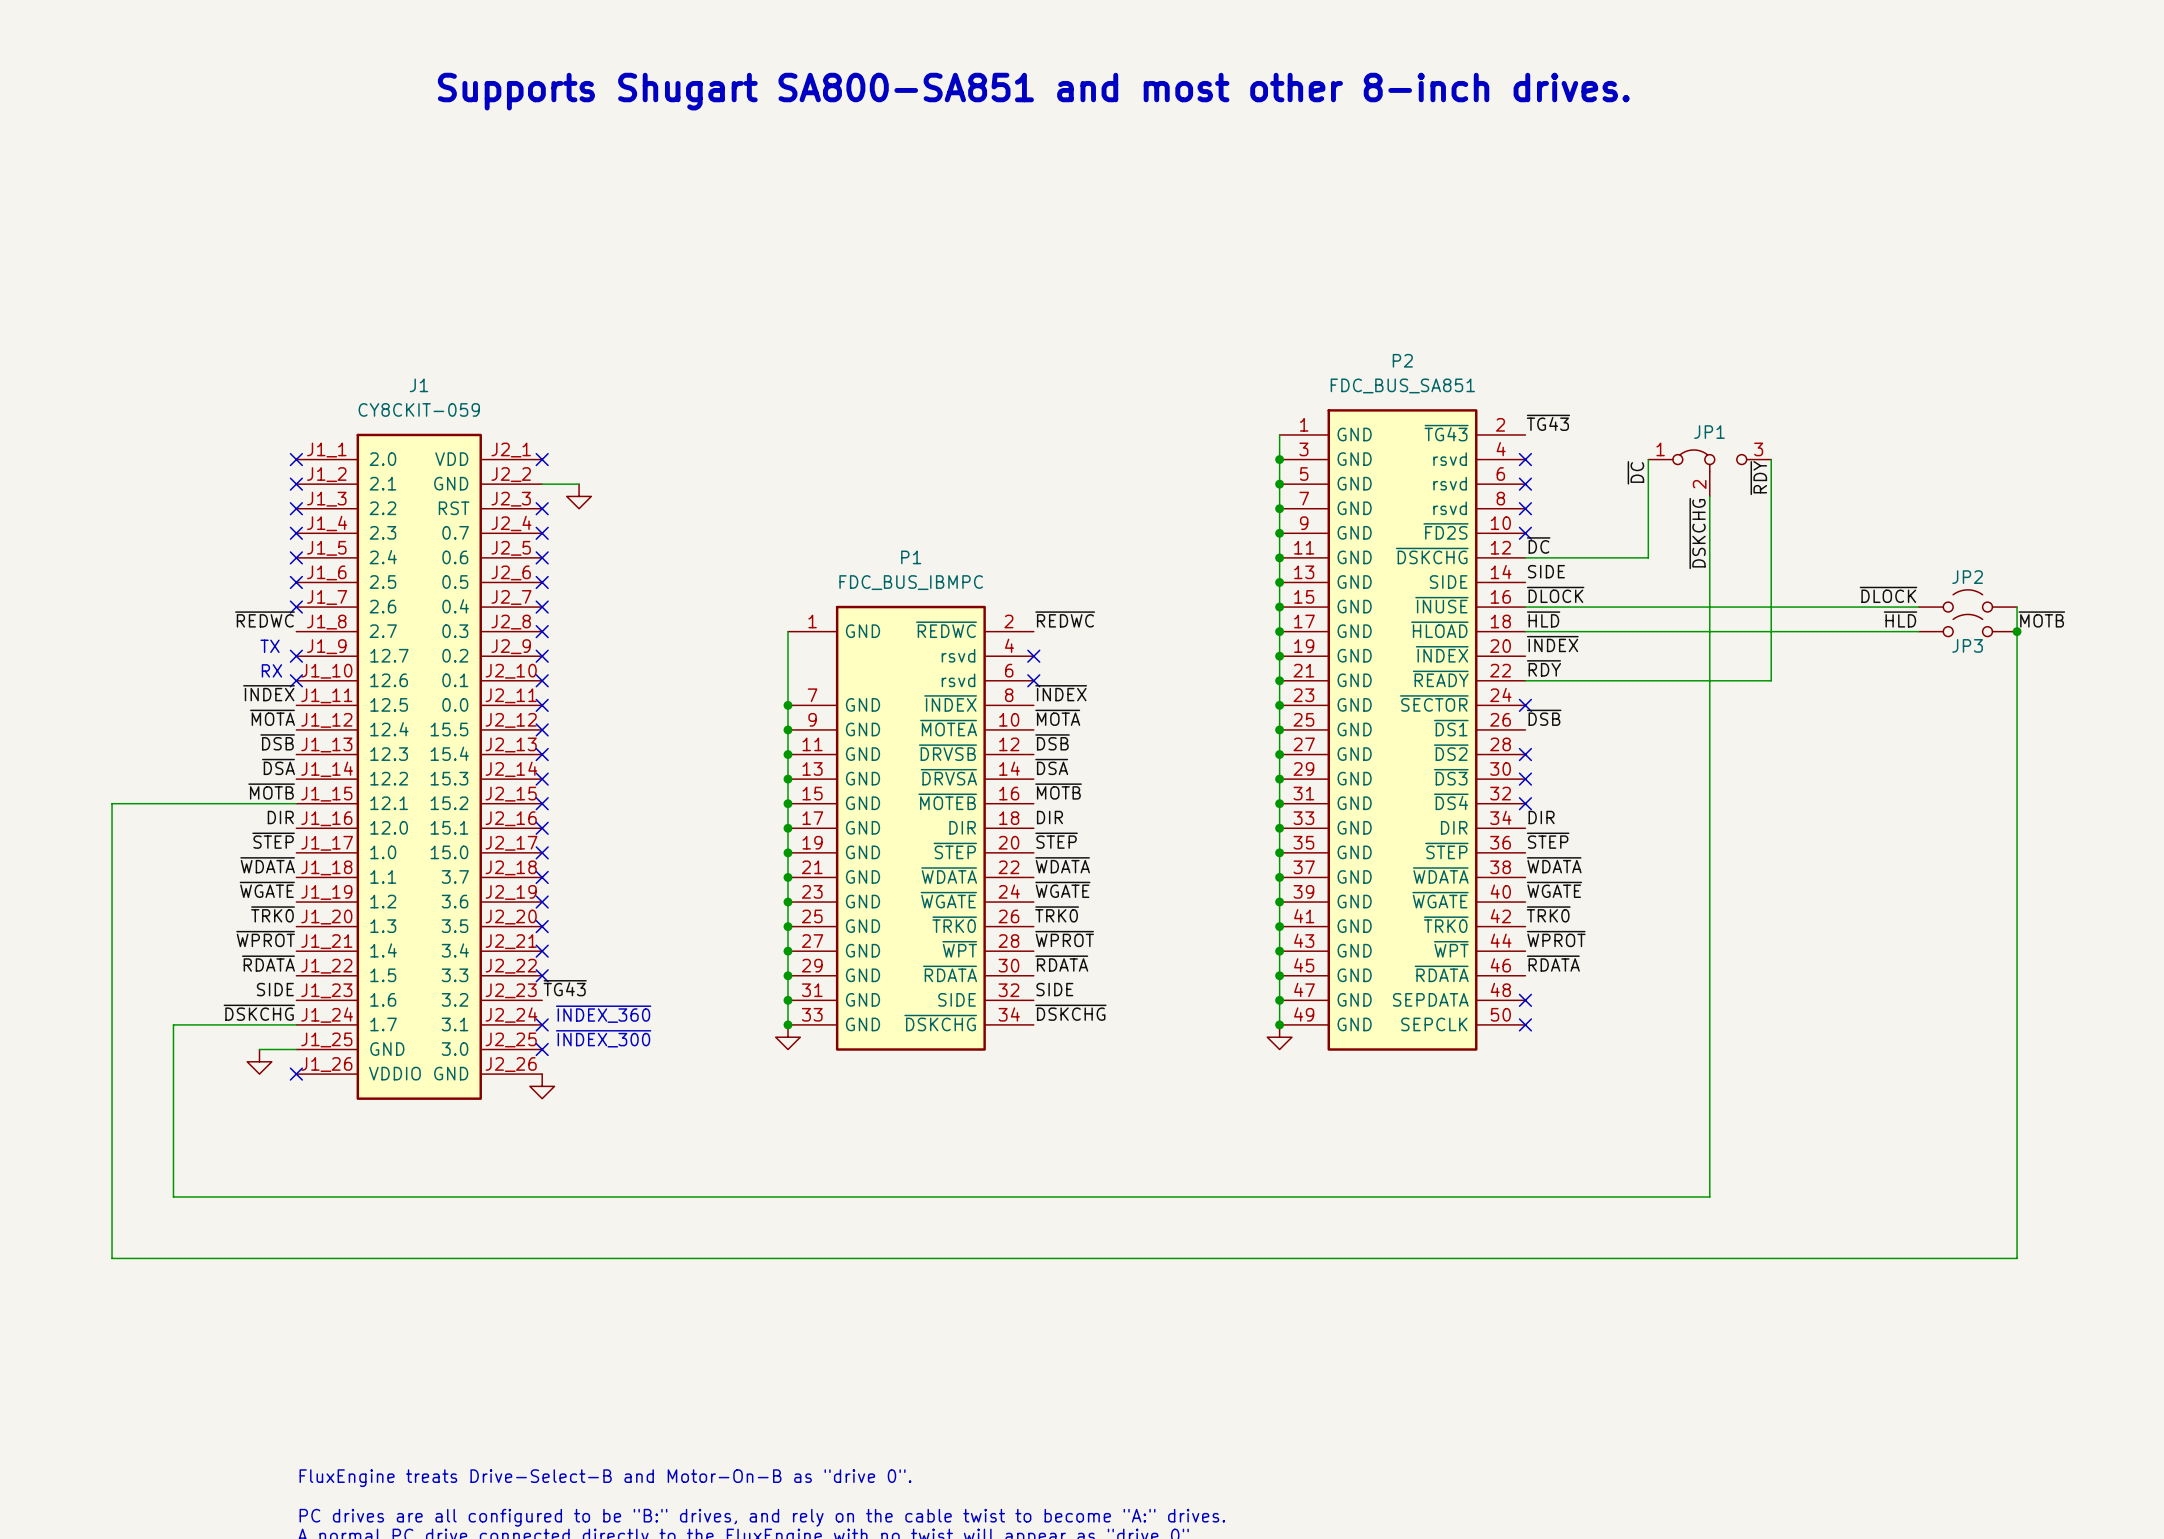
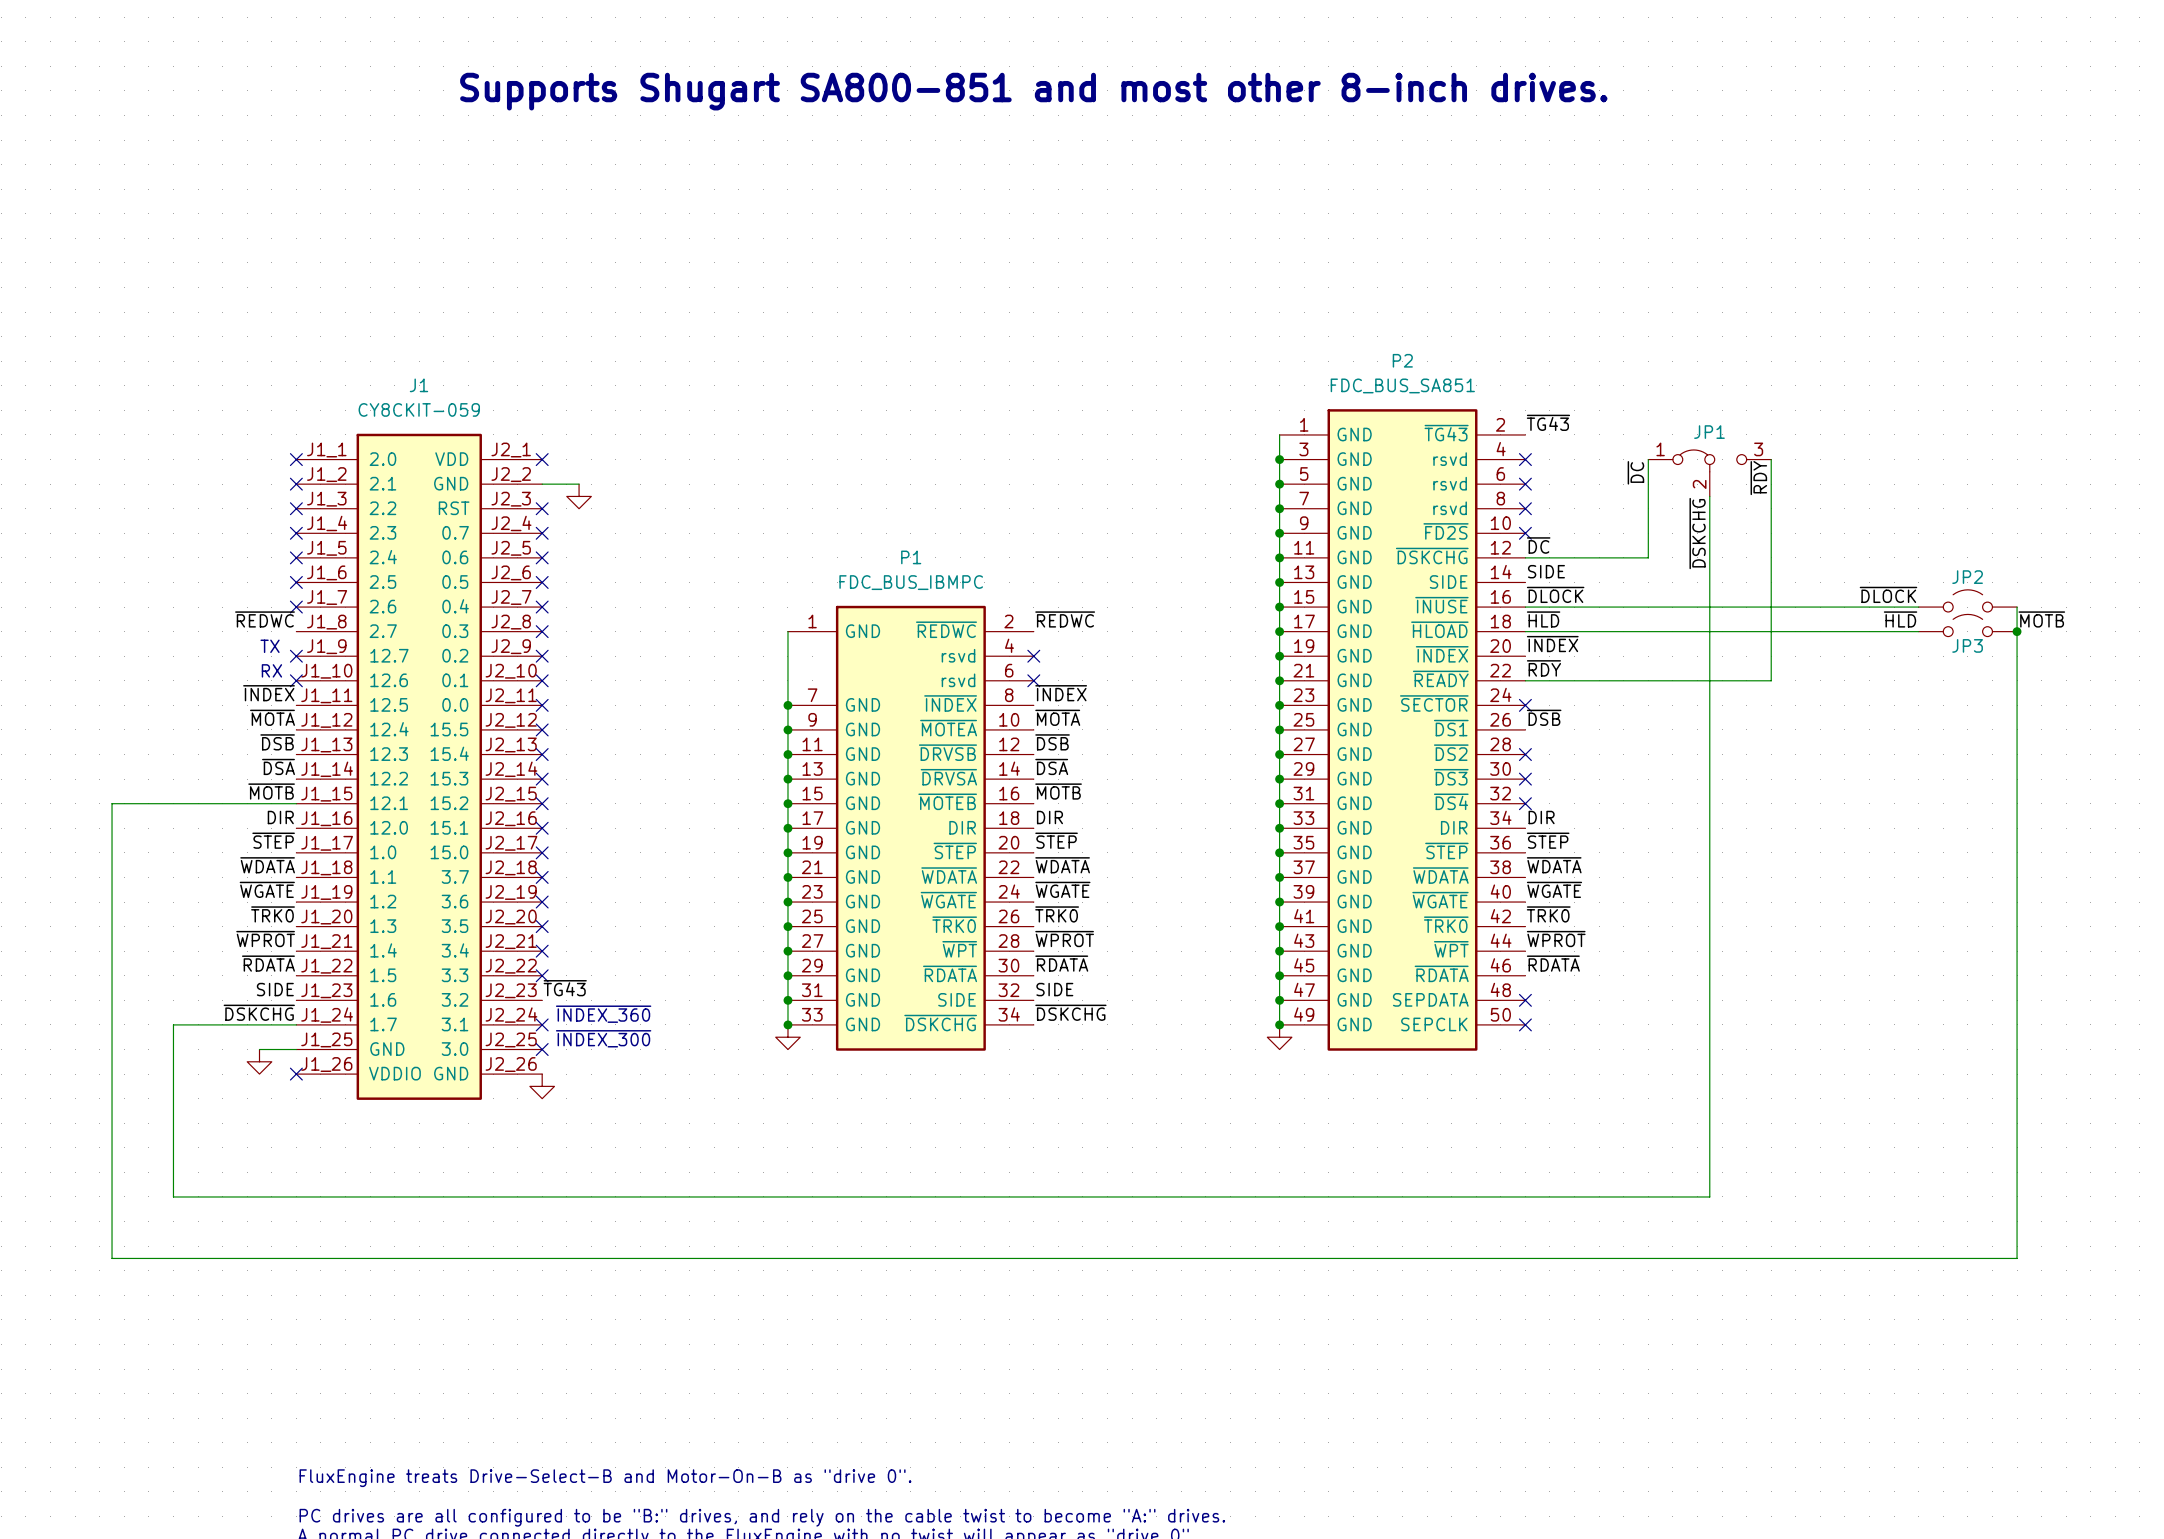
text: Supports Shugart SA800-SA851 and most other 8-inch drives. (1033, 91) -> Supports Shugart SA800-851 and most other 8-inch drives. (1033, 91)

